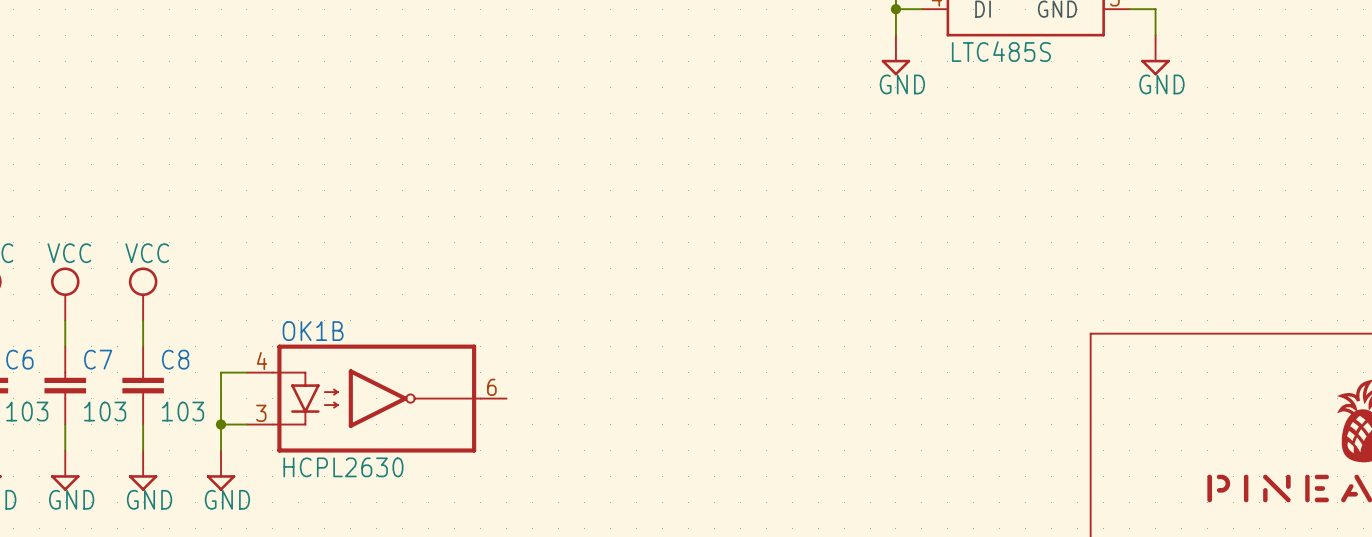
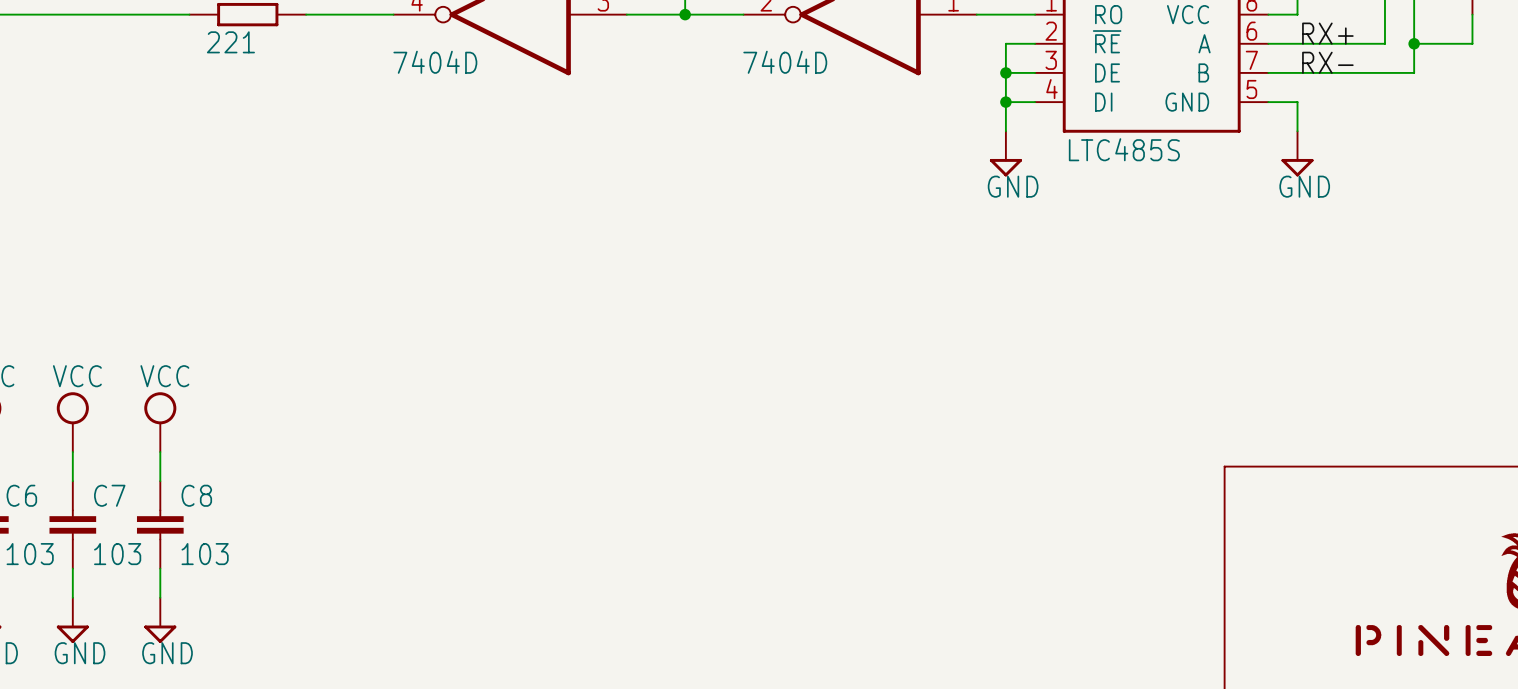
wire: (246, 372) (221, 372) (221, 450) -> none
OK1B: HCPL2630 (376, 398) -> none
wire: (221, 424) (246, 424) -> none
junction: (221, 424) -> none
power symbol: GND (221, 470) -> none

